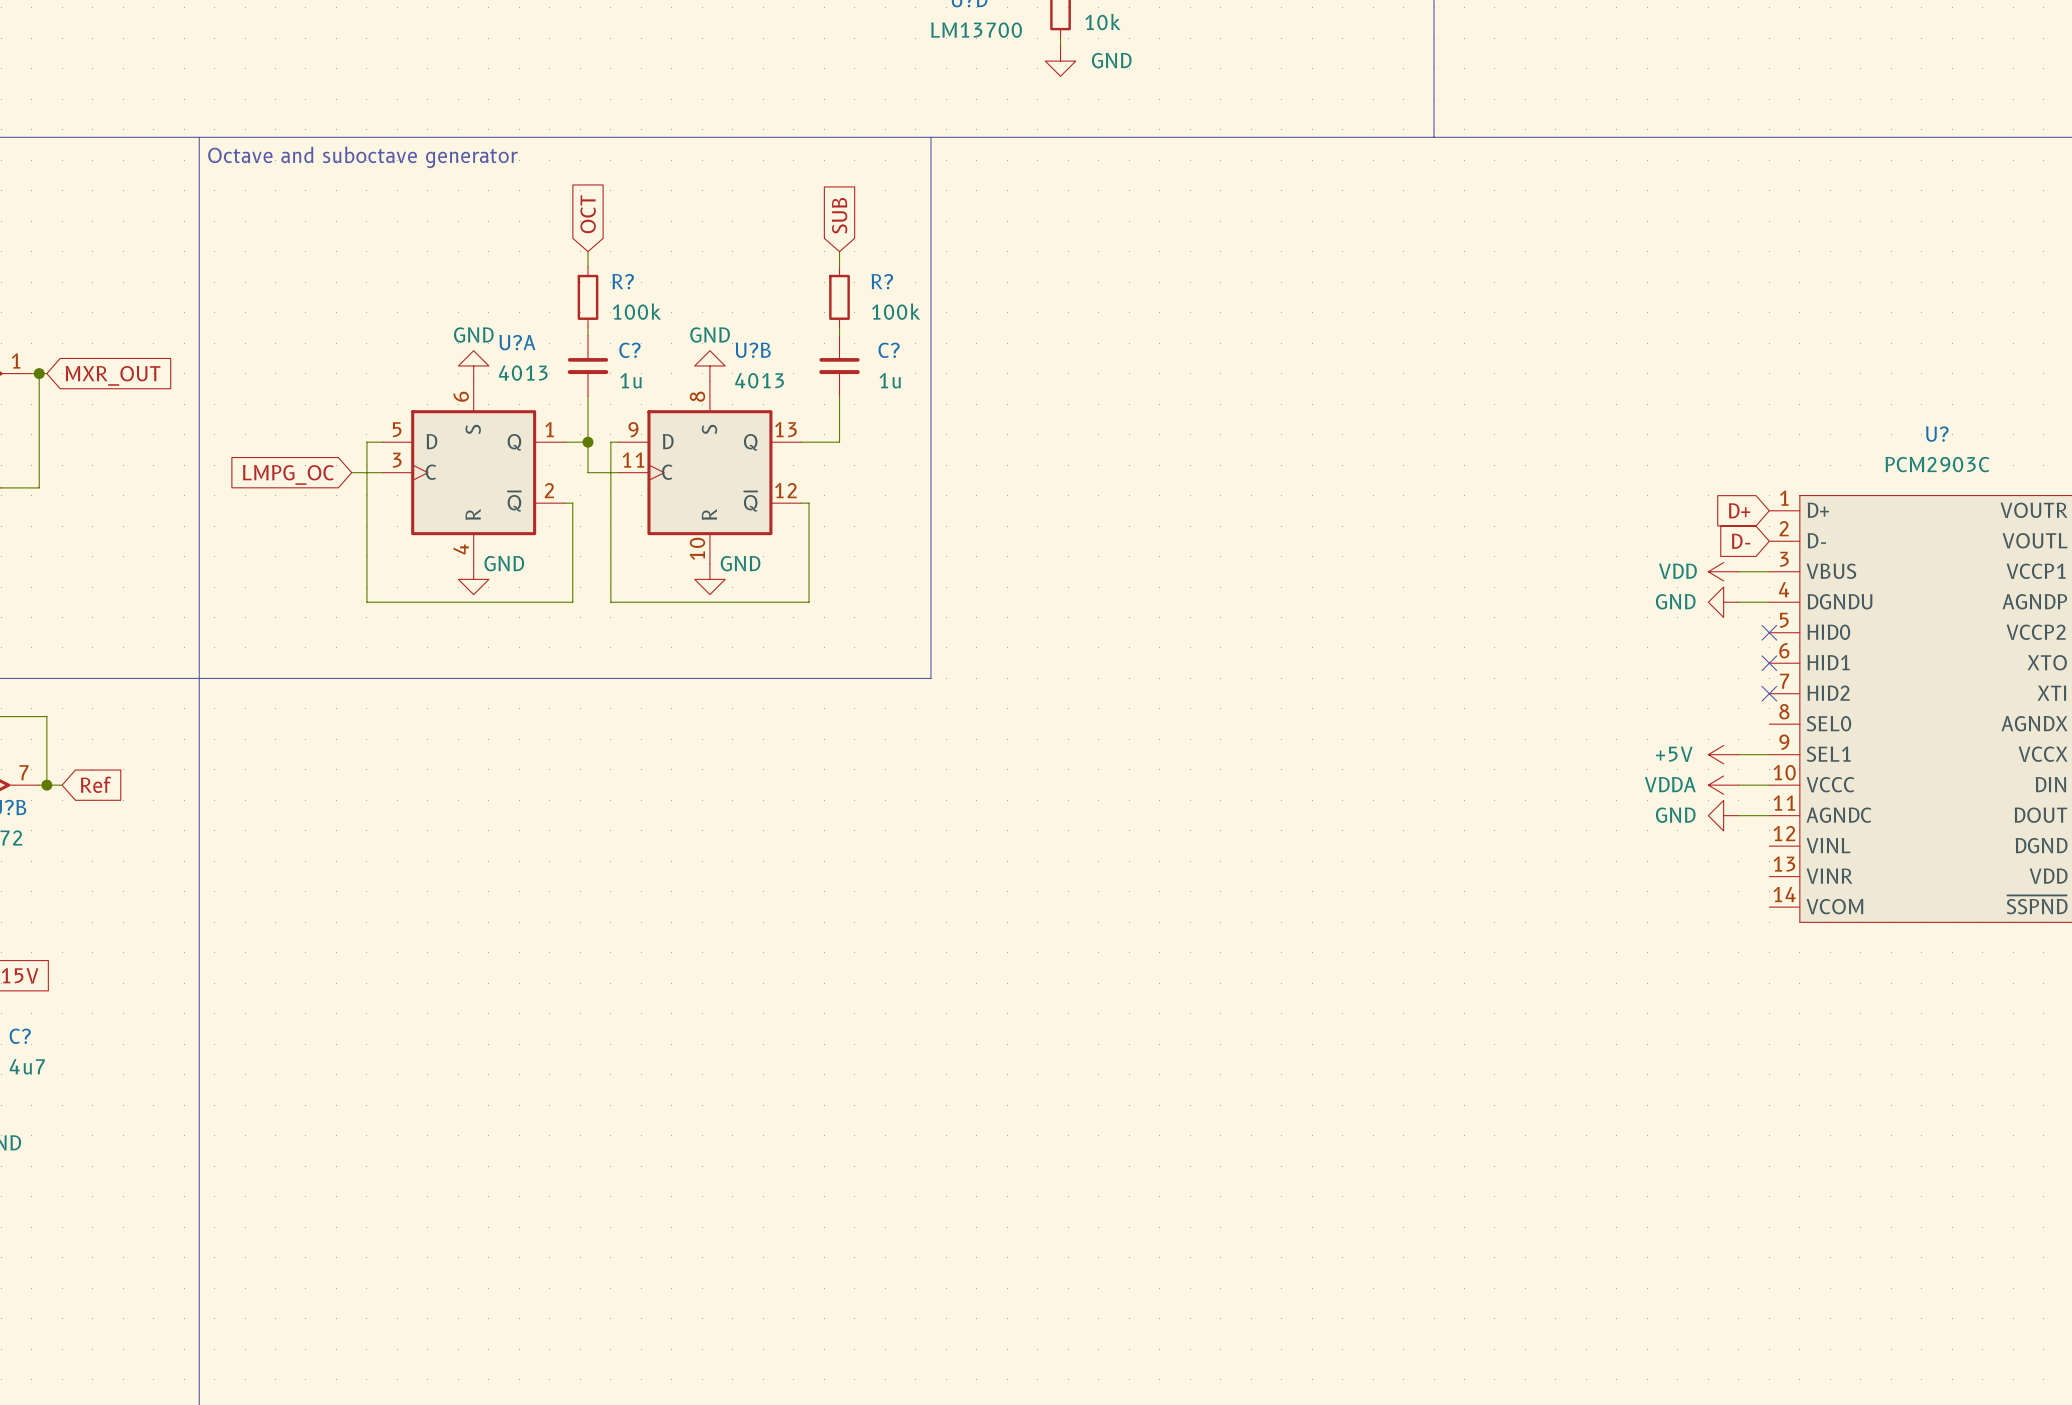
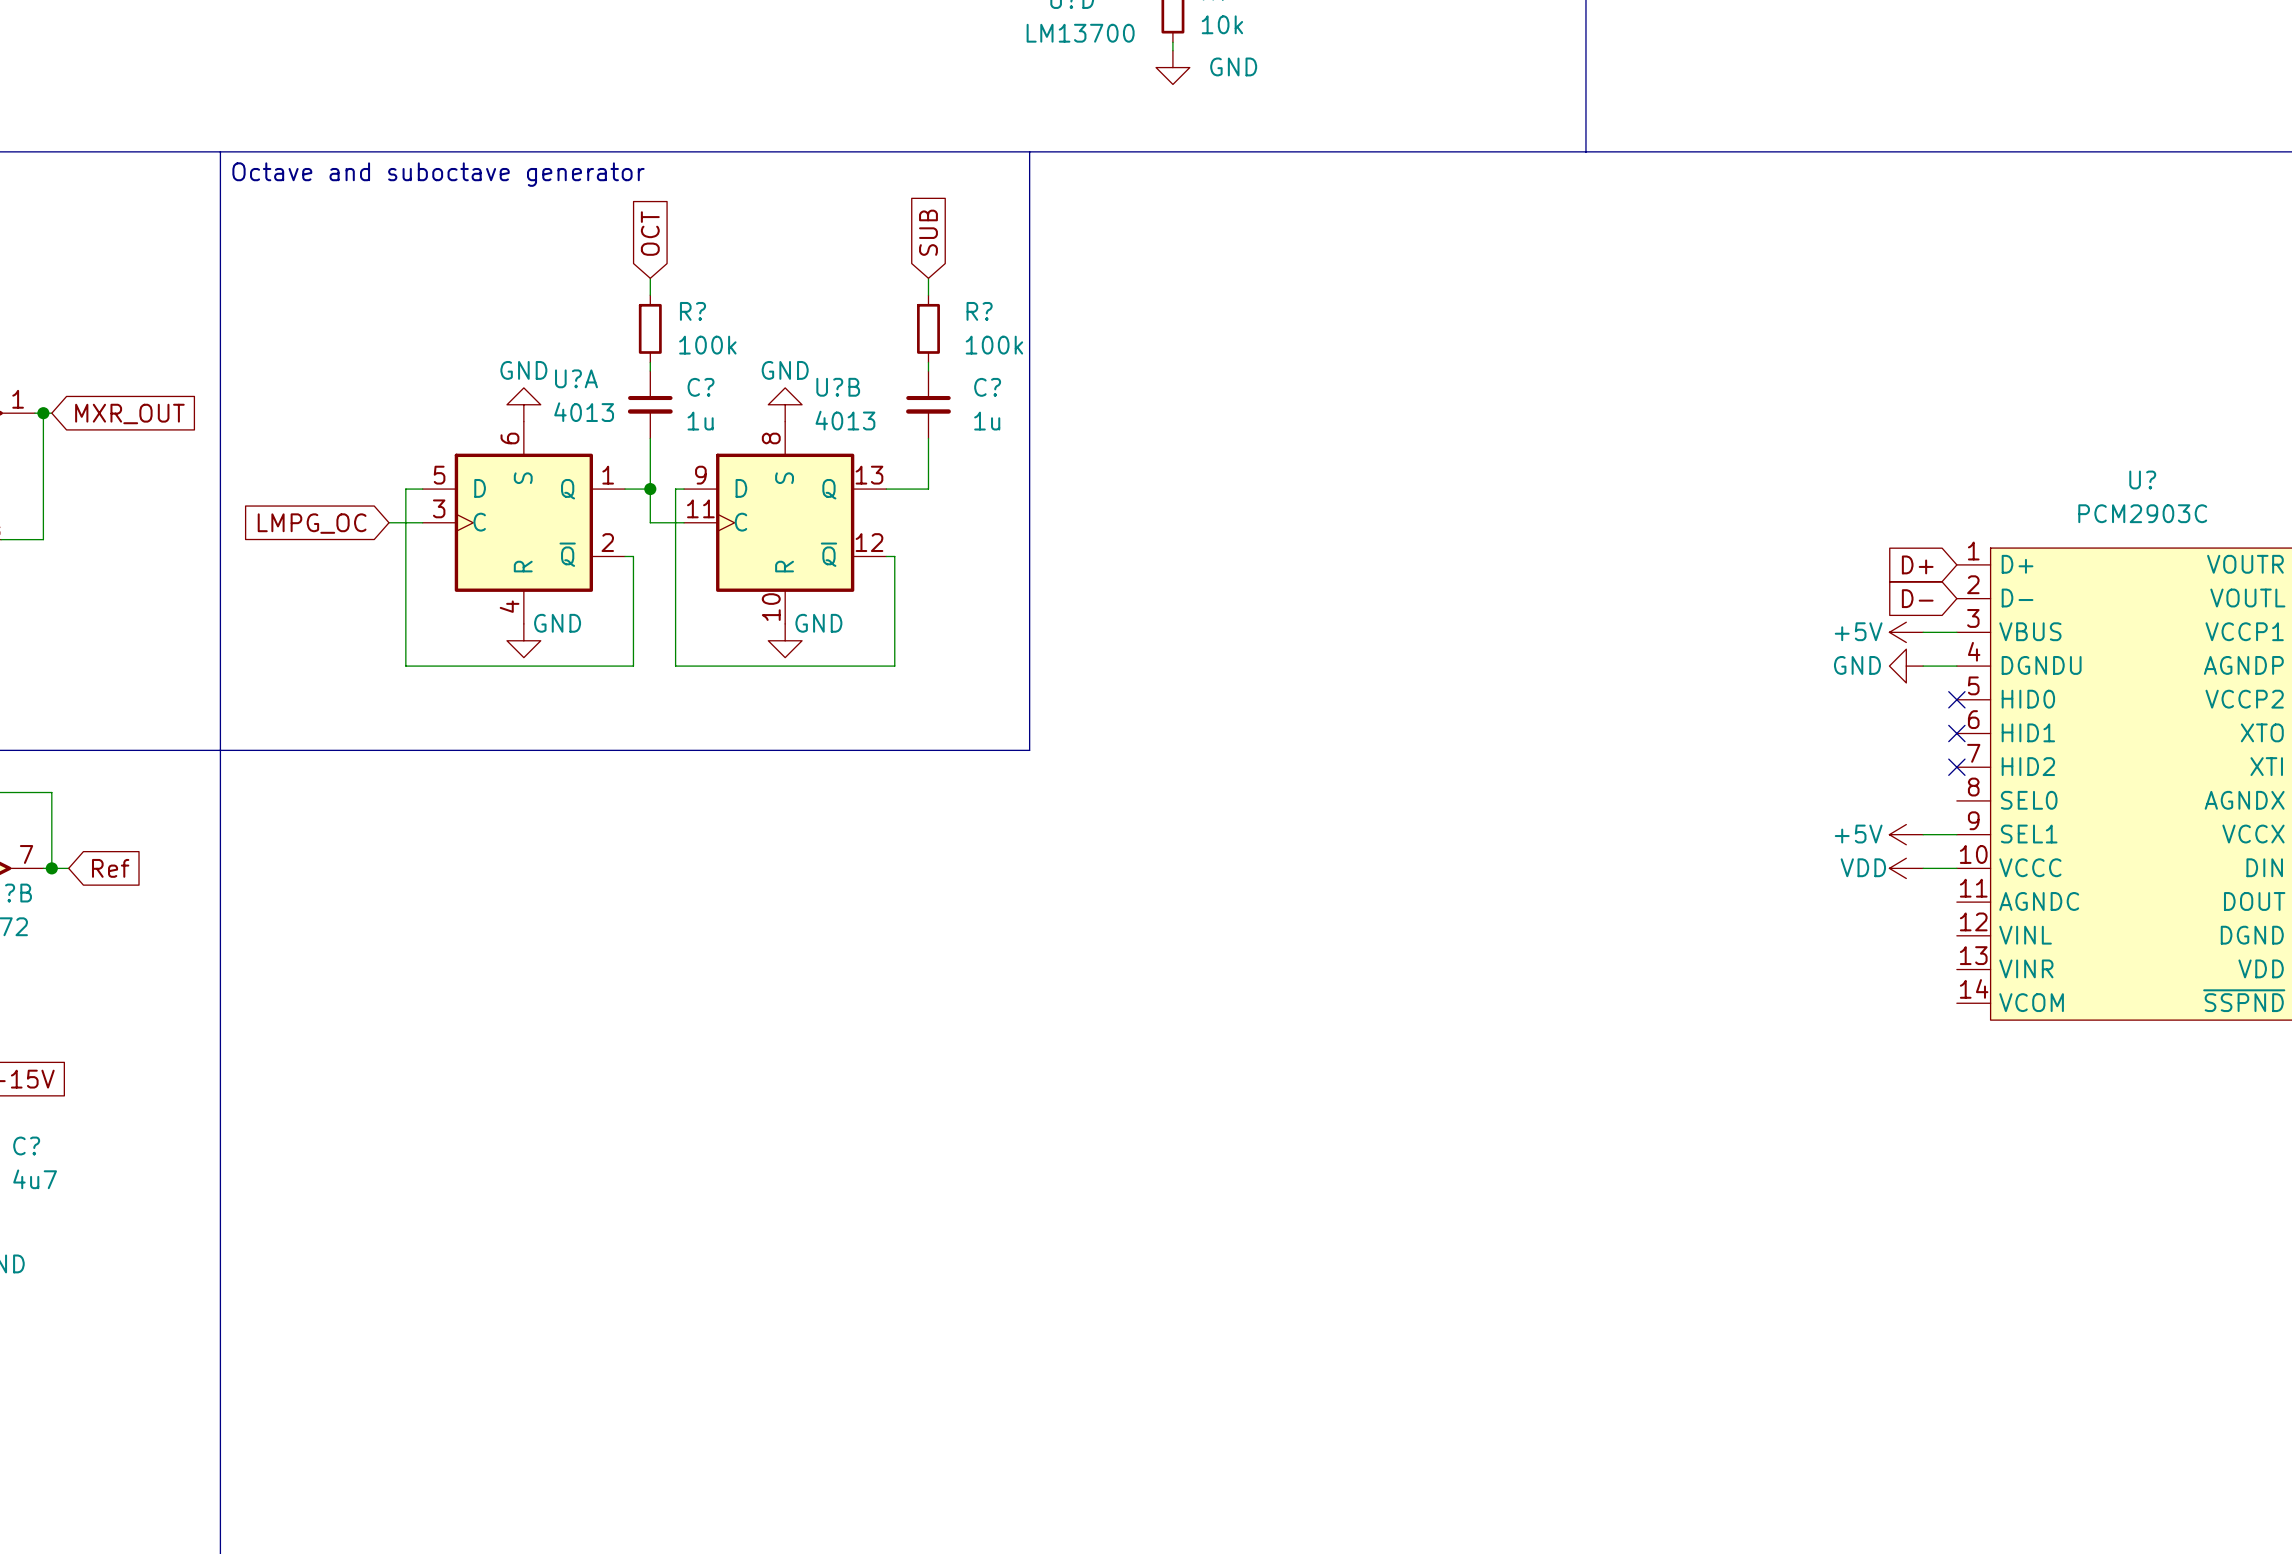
power symbol: VDD (1723, 571) -> +5V (1906, 632)
power symbol: VDDA (1723, 785) -> VDD (1906, 868)
power symbol: GND (1723, 815) -> none
wire: (1738, 815) (1769, 815) -> none

